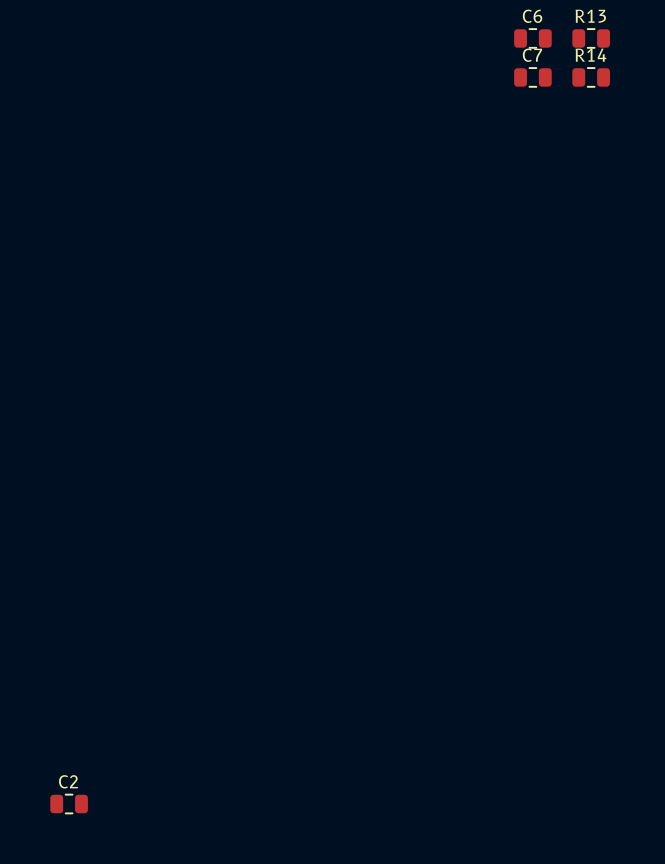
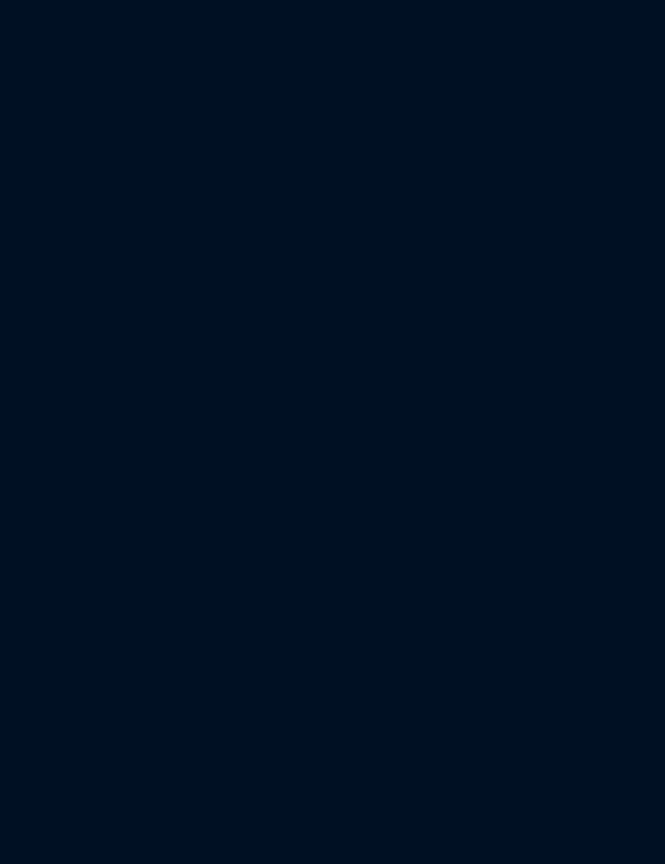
C6: (532, 38) -> none
R13: (591, 38) -> none
C7: (532, 77) -> none
R14: (591, 77) -> none
C2: (69, 804) -> none

